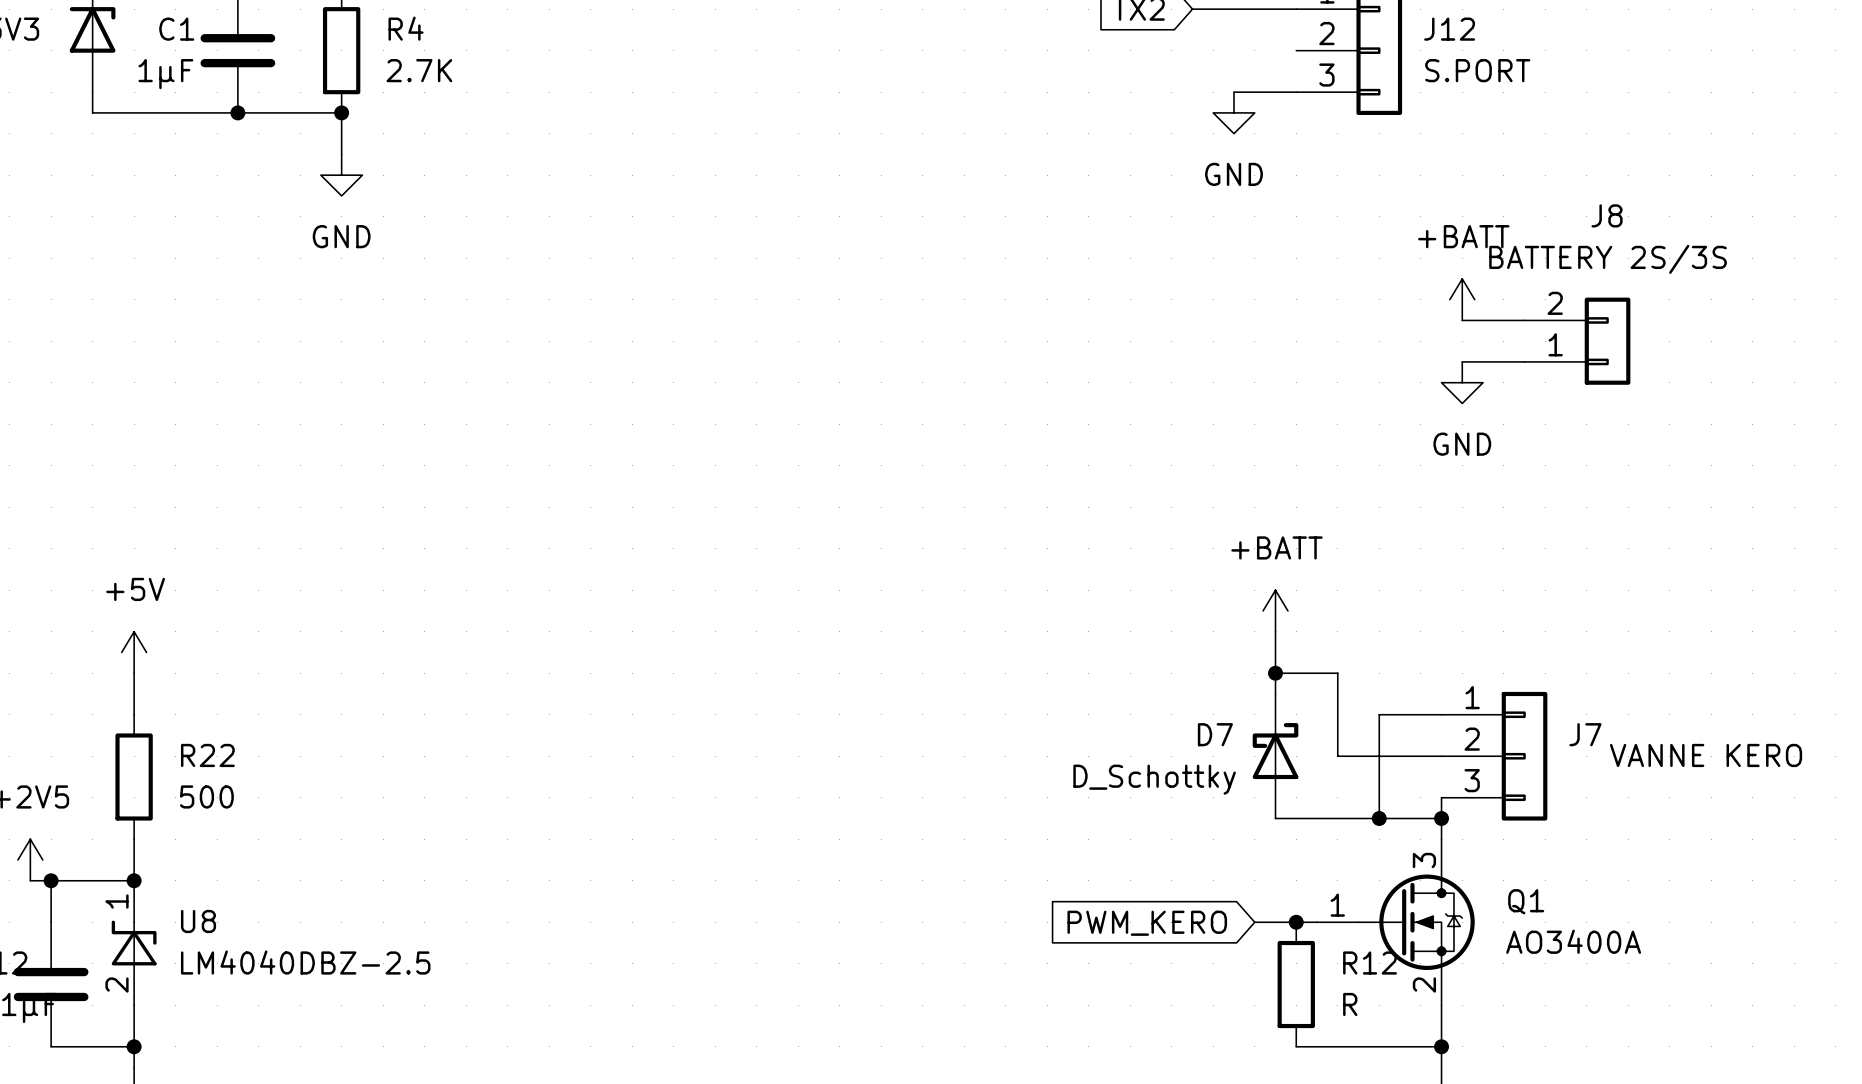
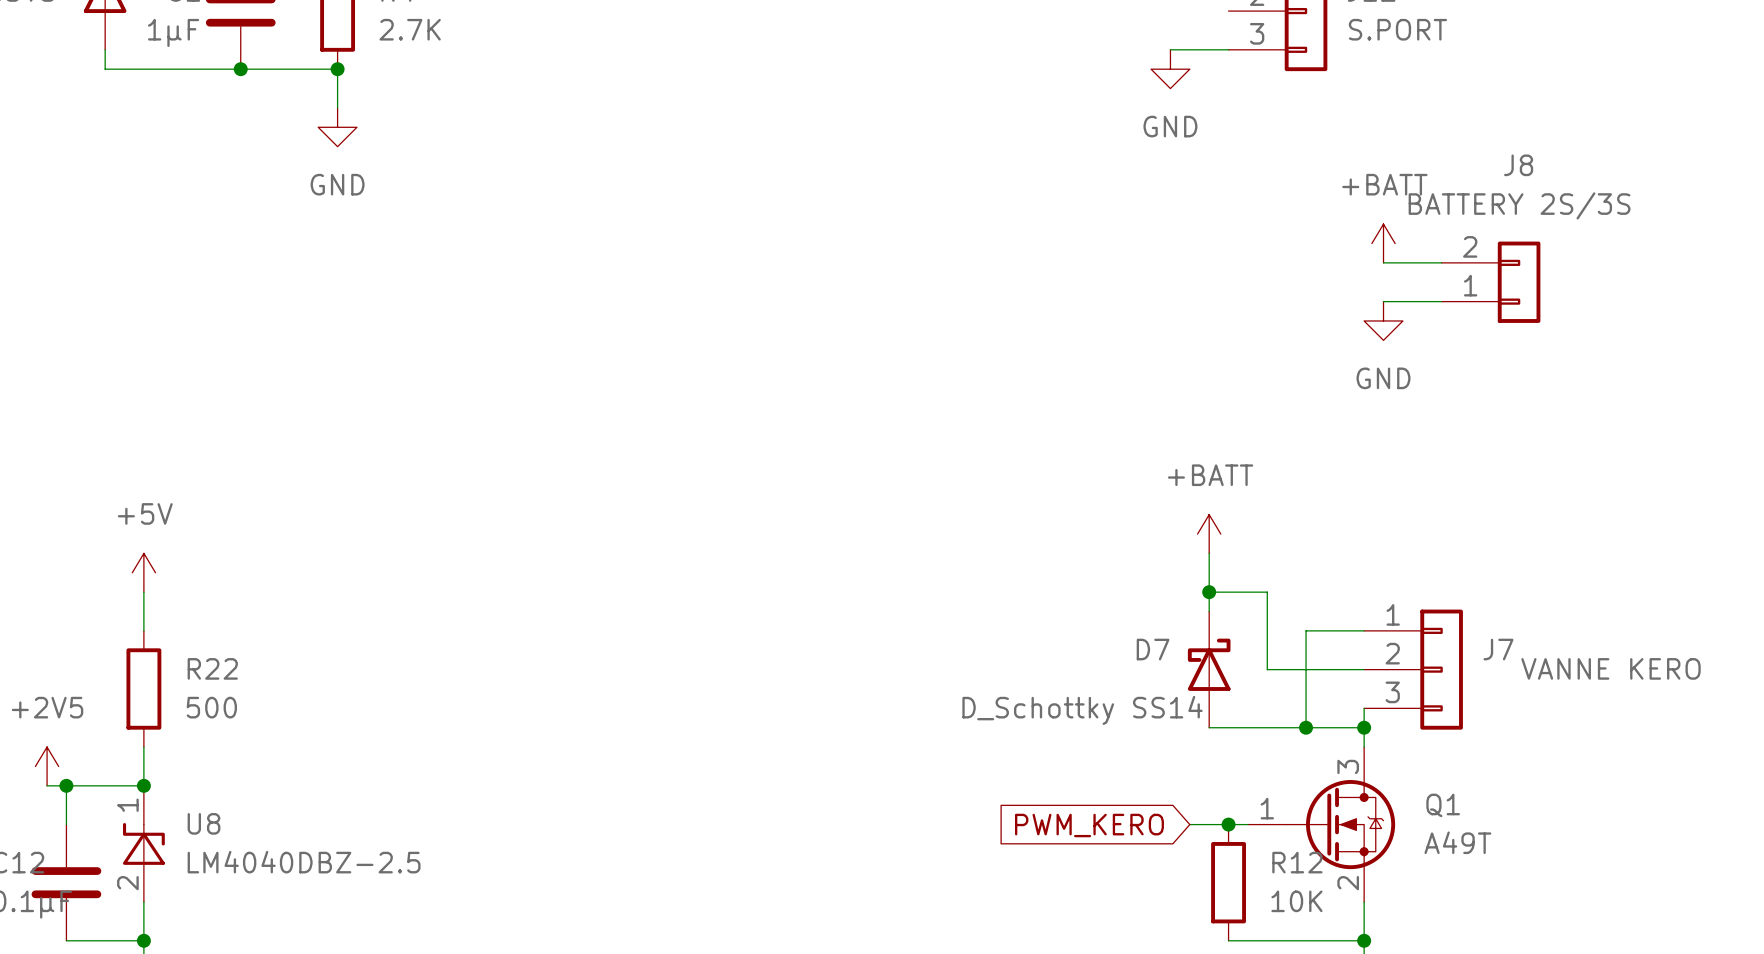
D7 value: D_Schottky (1154, 779) -> D_Schottky SS14 (1082, 710)
Q1 value: AO3400A (1573, 941) -> A49T (1457, 842)
R12 value: R (1350, 1004) -> 10K (1296, 901)

